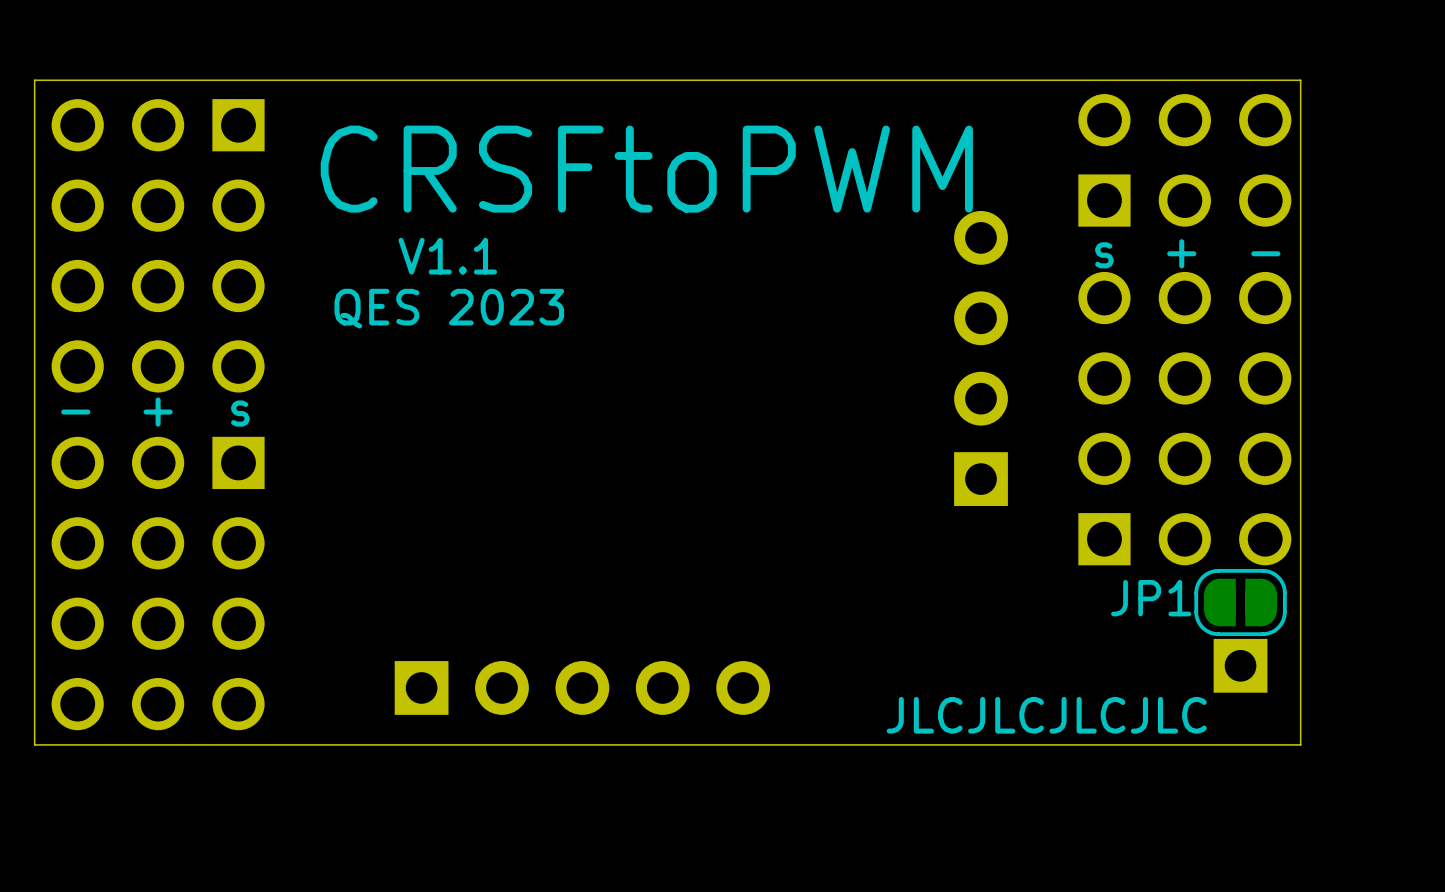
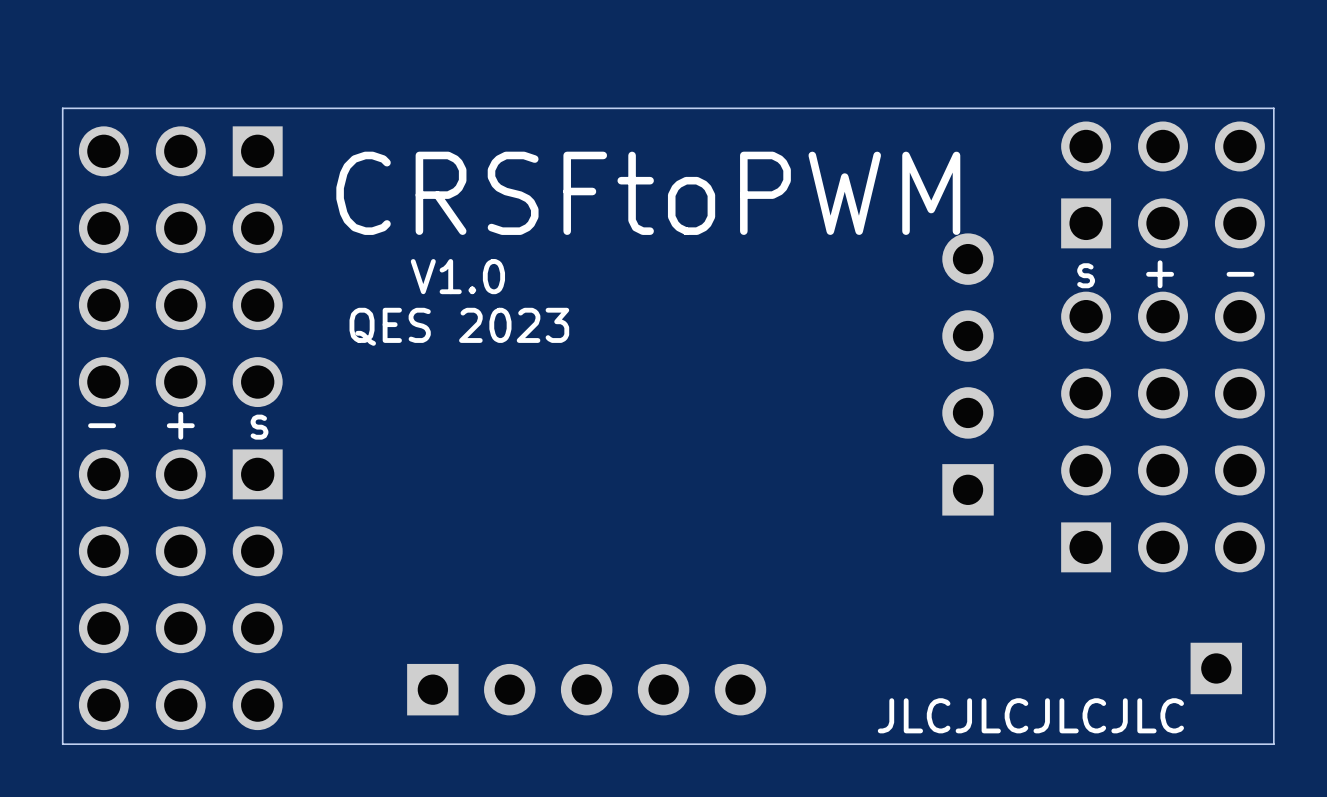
text: V1.1 (447, 256) -> V1.0 (457, 276)
JP1: (1240, 602) -> none

